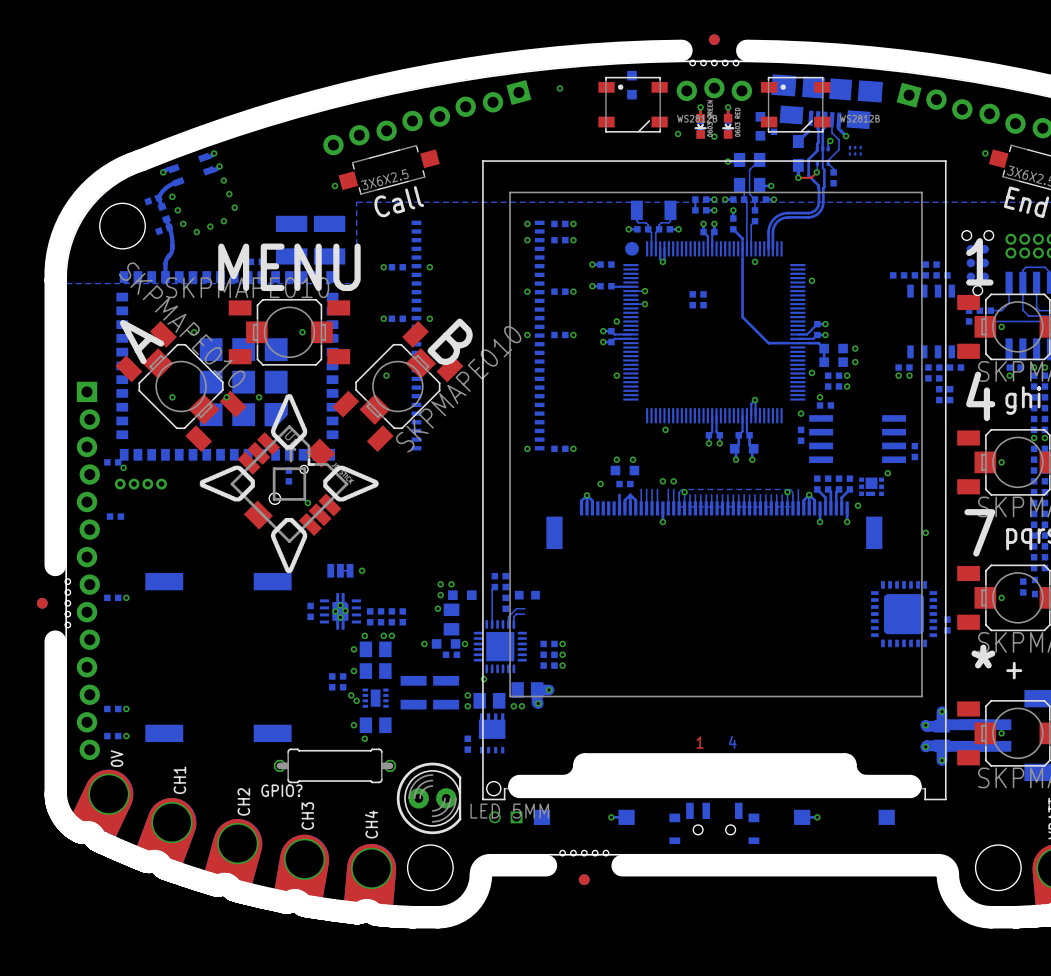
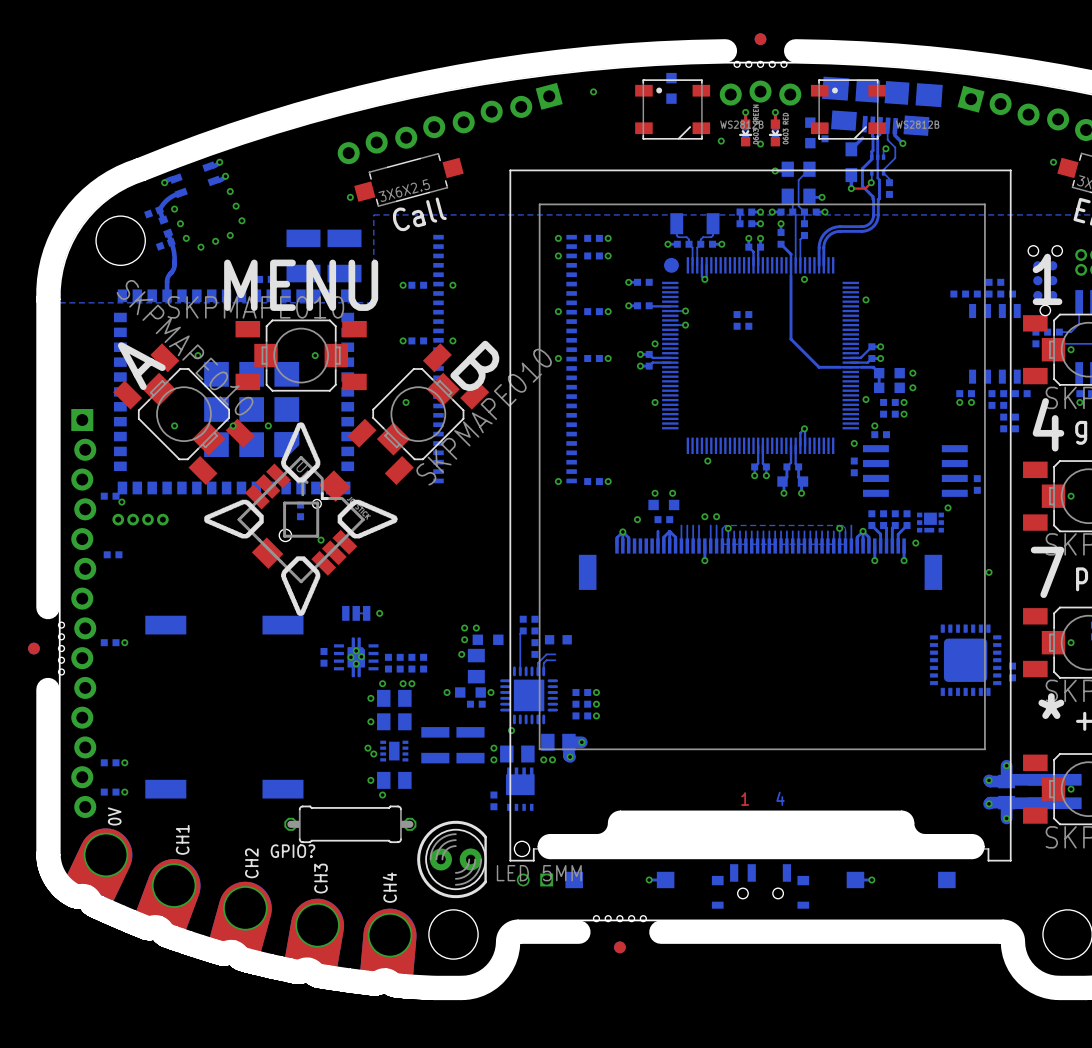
part: (855, 150) -> none
part: (332, 681) -> none
part: (343, 681) -> none

